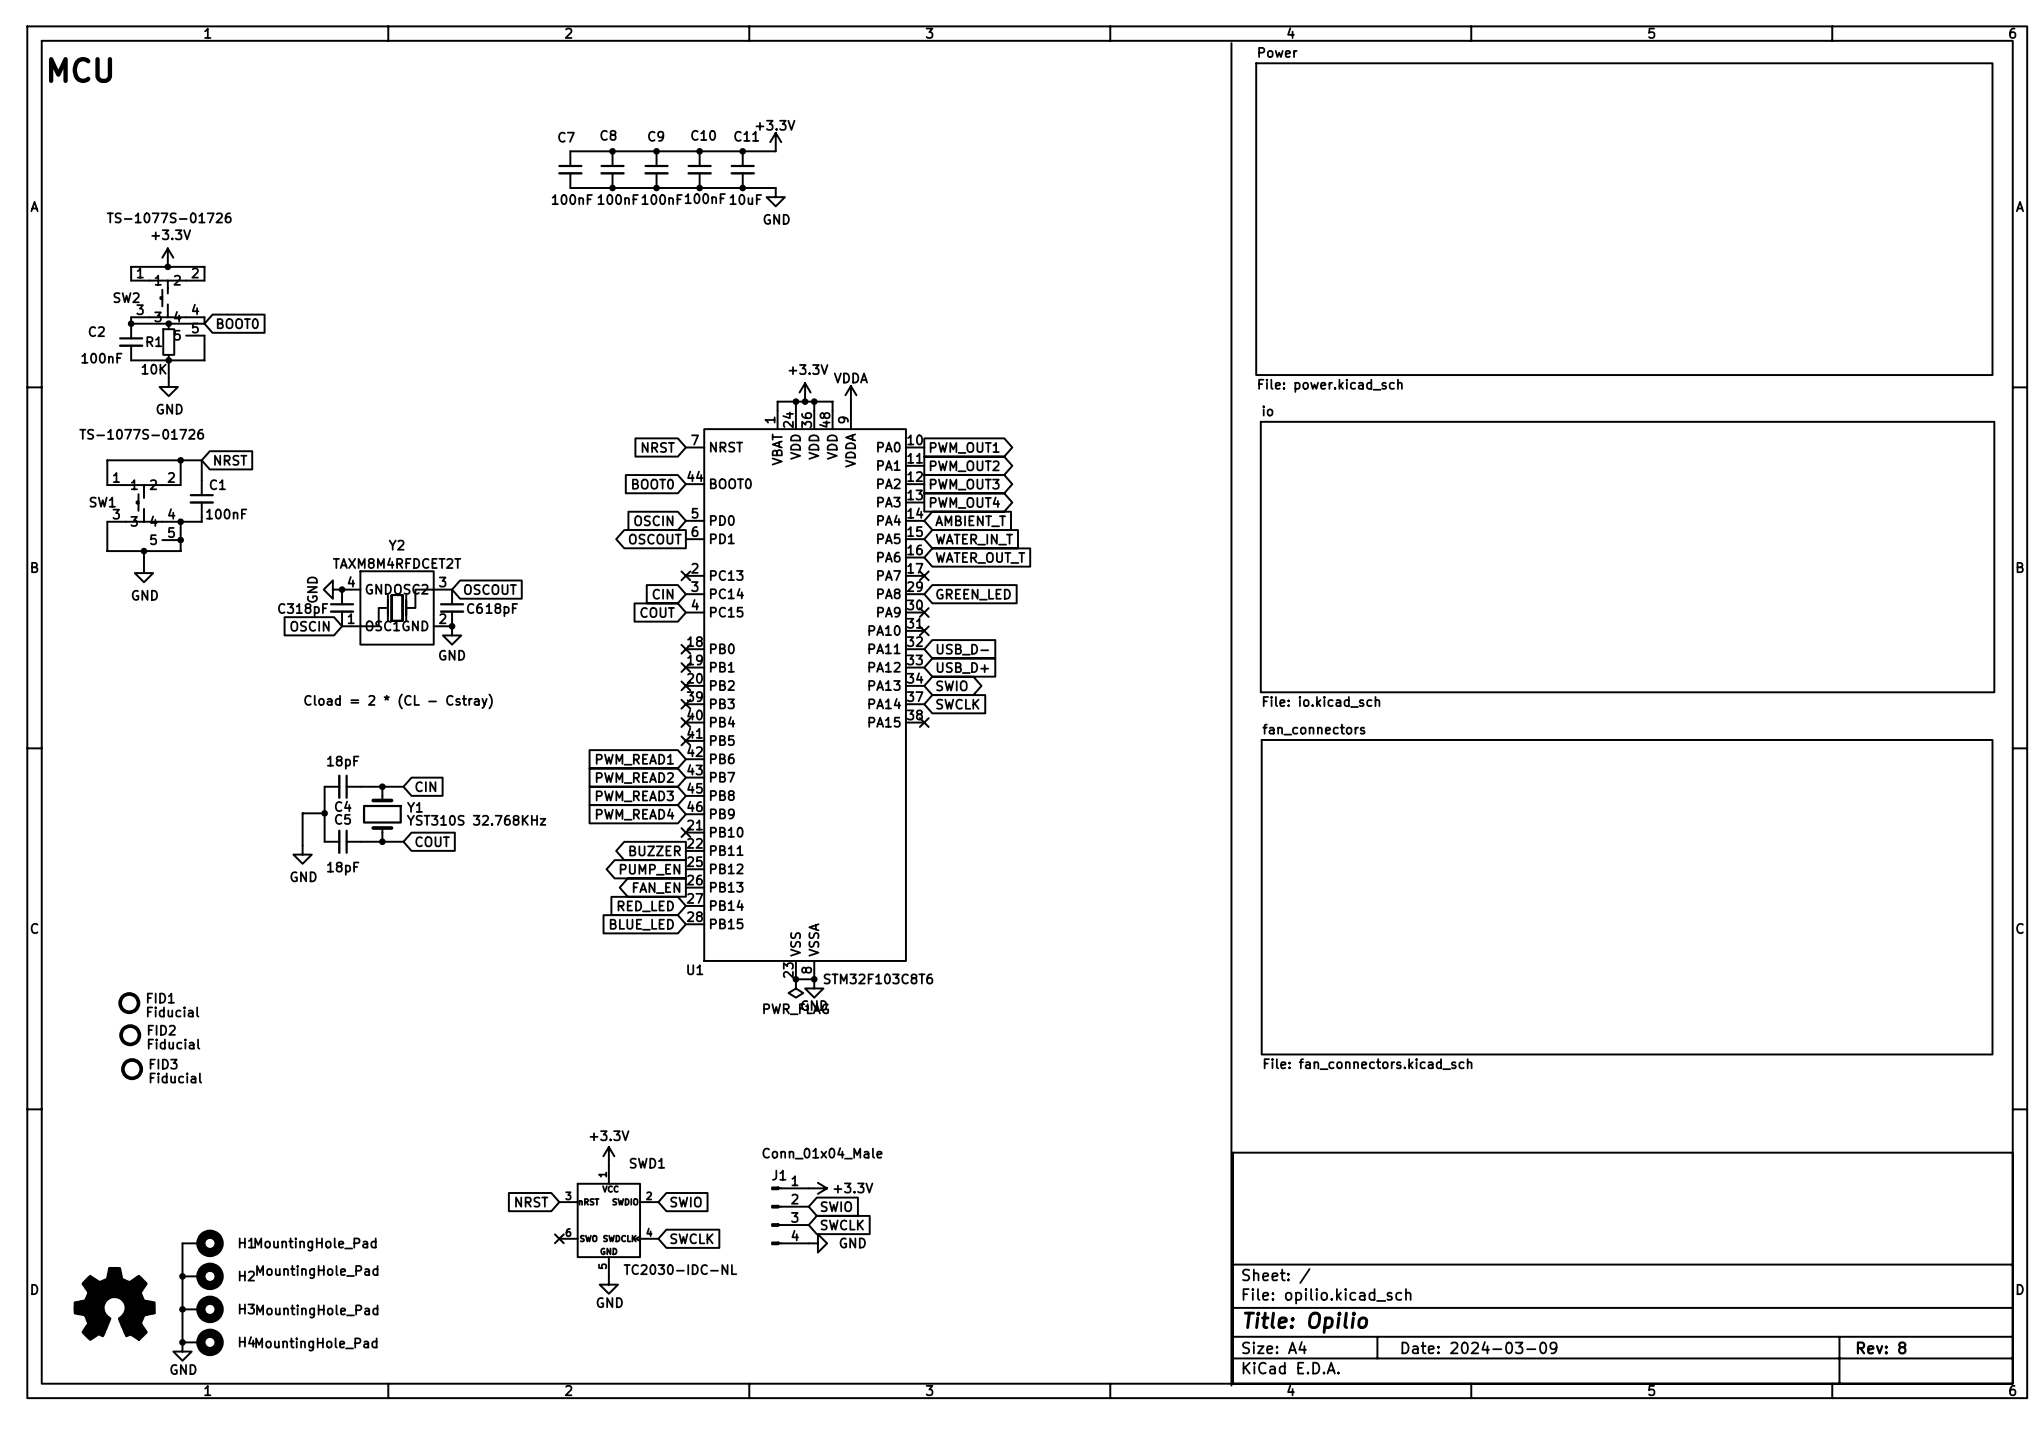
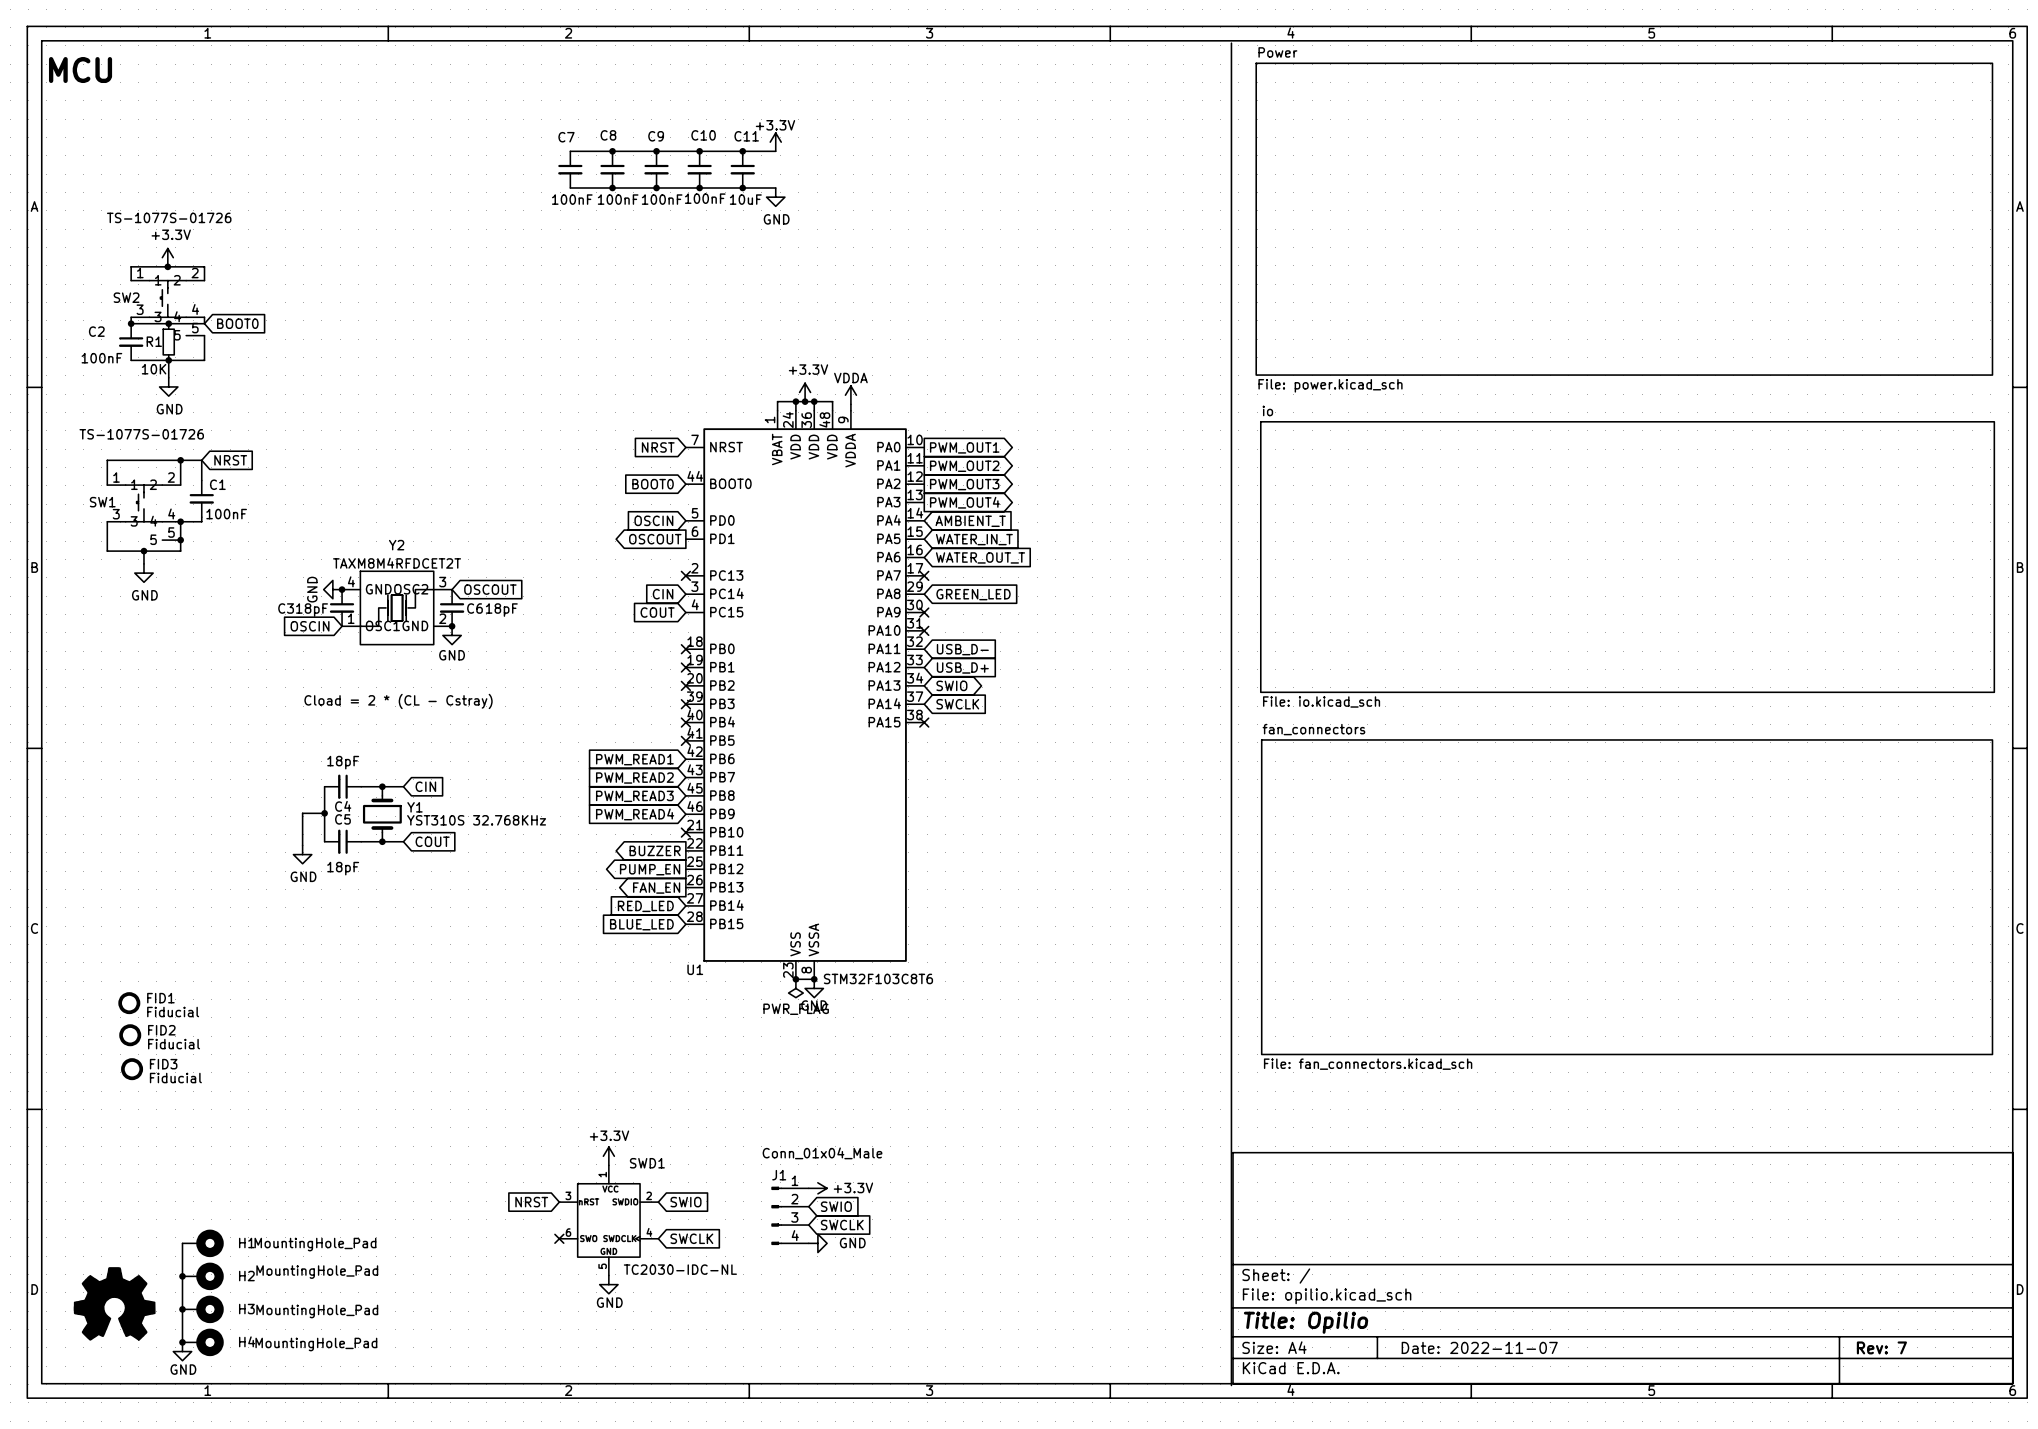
title block: Date: 2024-03-09 (1479, 1347) -> Date: 2022-11-07 (1479, 1347)
title block: Rev: 8 (1881, 1347) -> Rev: 7 (1881, 1347)

